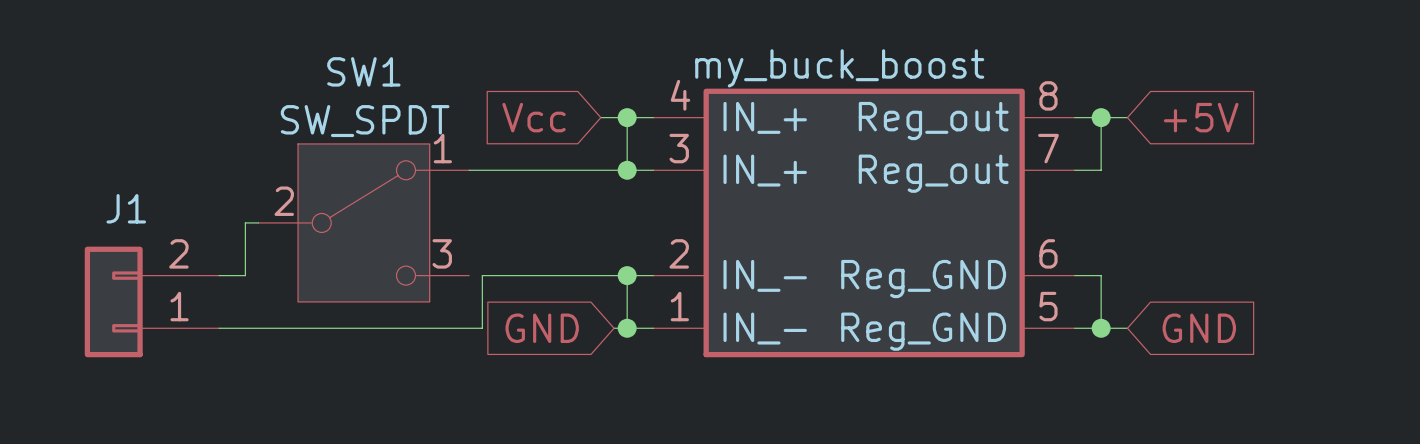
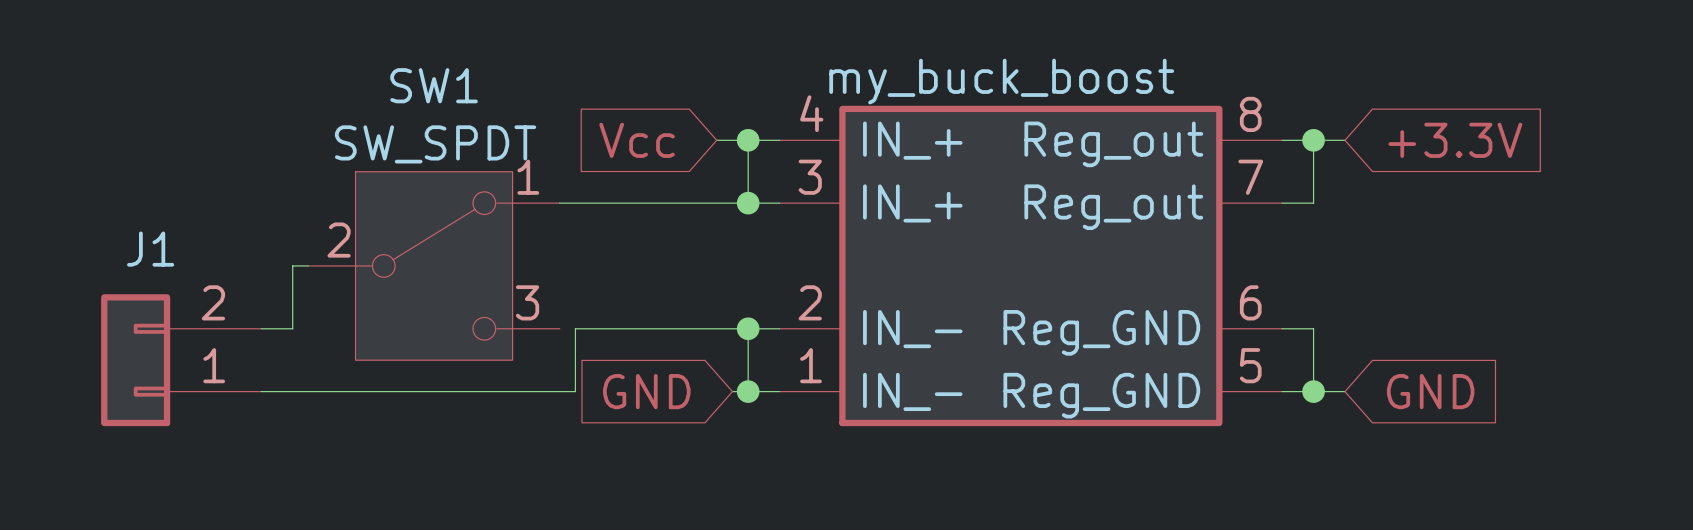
global label: +5V (1201, 117) -> +3.3V (1455, 140)

